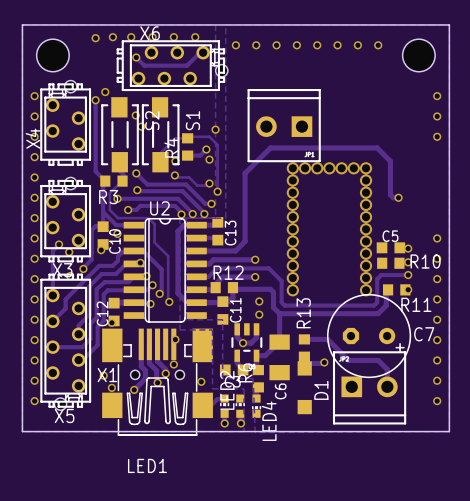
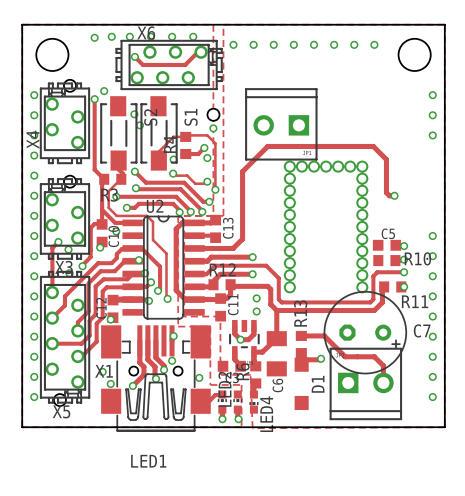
hole position: (221, 70) -> (213, 114)

